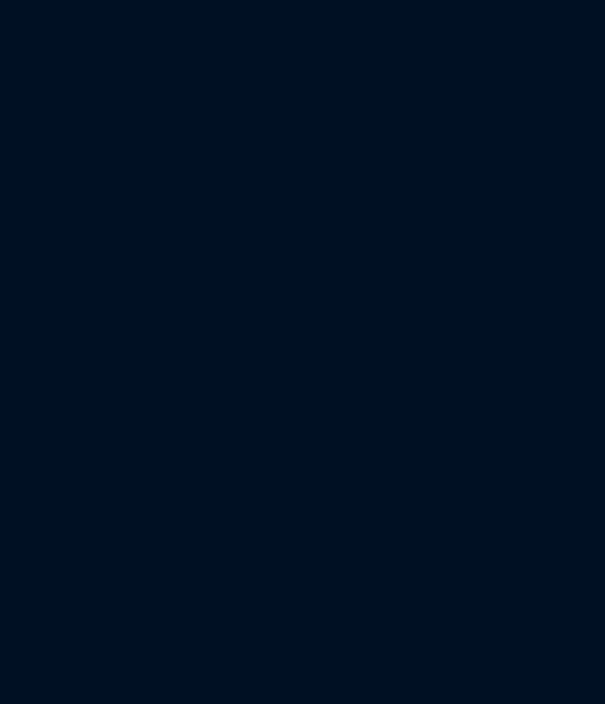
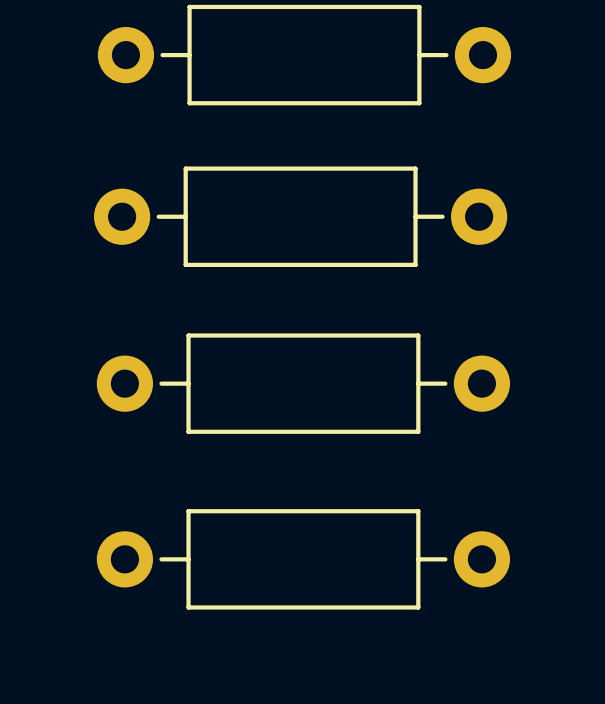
part: none -> (304, 55)
part: none -> (300, 216)
part: none -> (303, 383)
part: none -> (303, 559)

